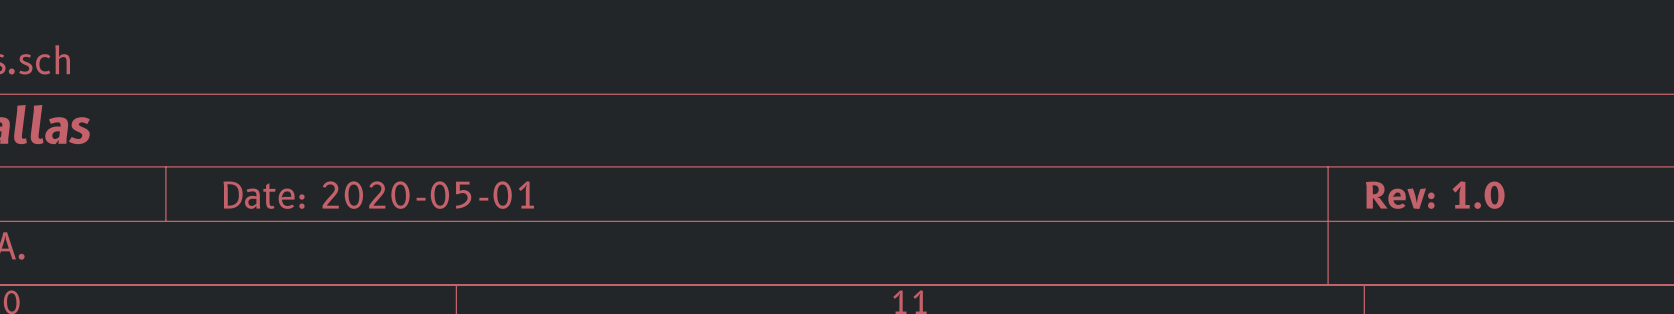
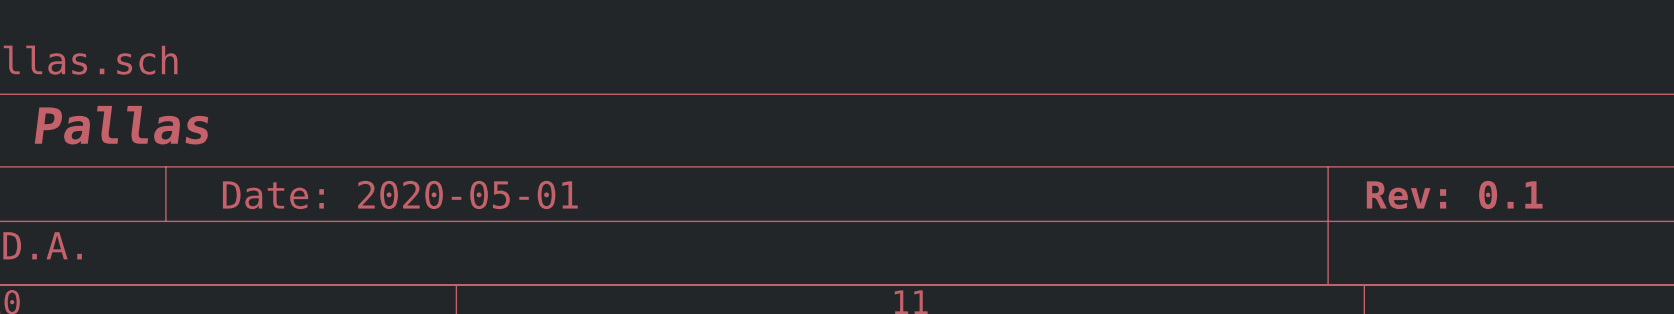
title block: Rev: 1.0 (1435, 195) -> Rev: 0.1 (1454, 194)

